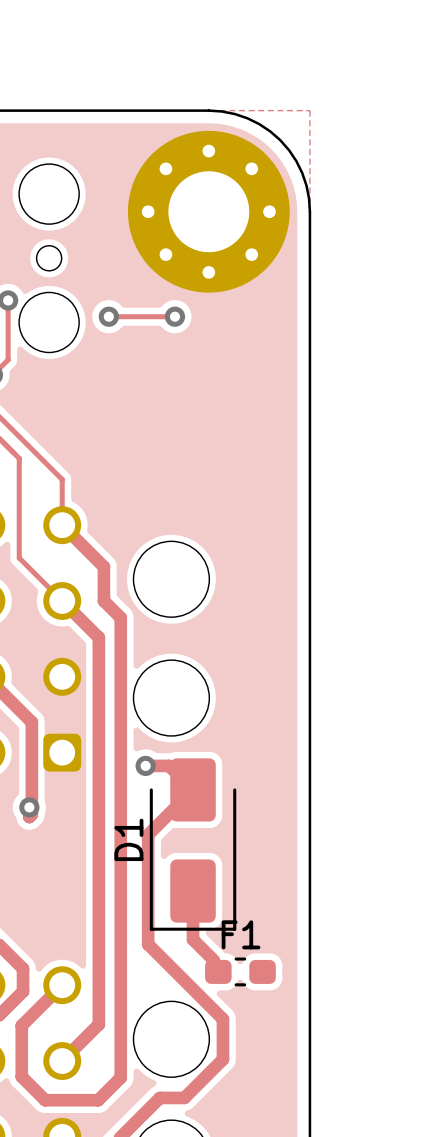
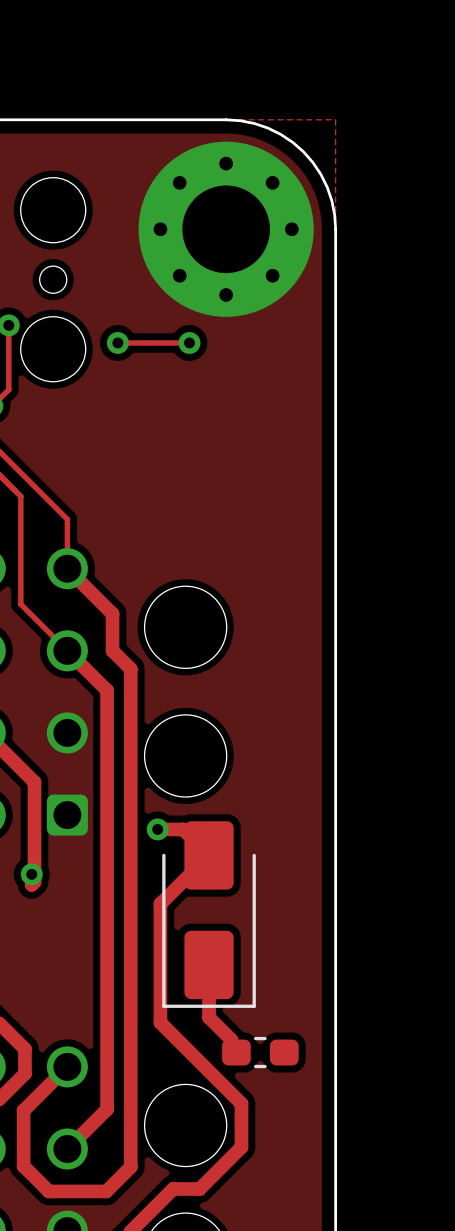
D1 name: D1 (128, 839) -> none
F1 name: F1 (241, 934) -> none

